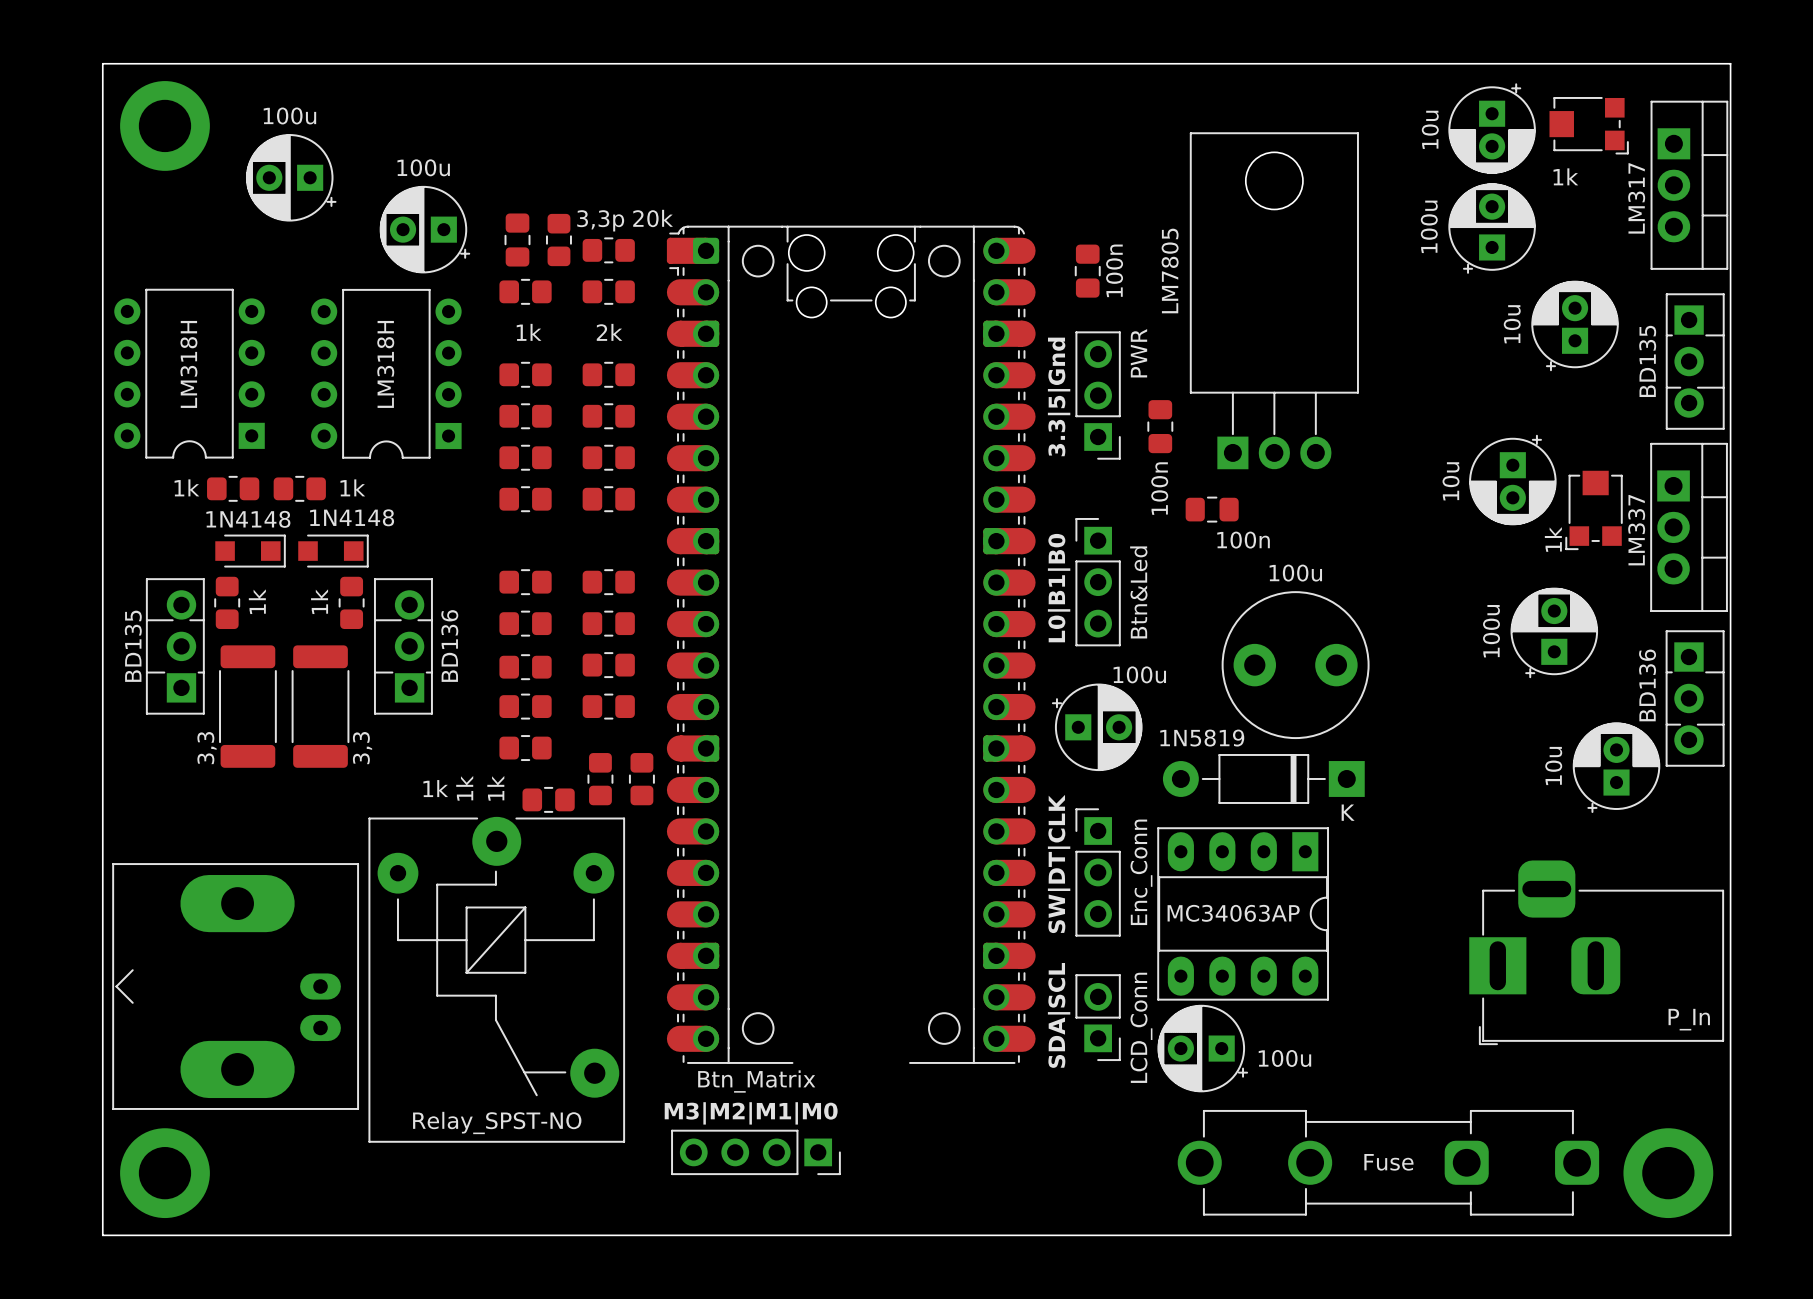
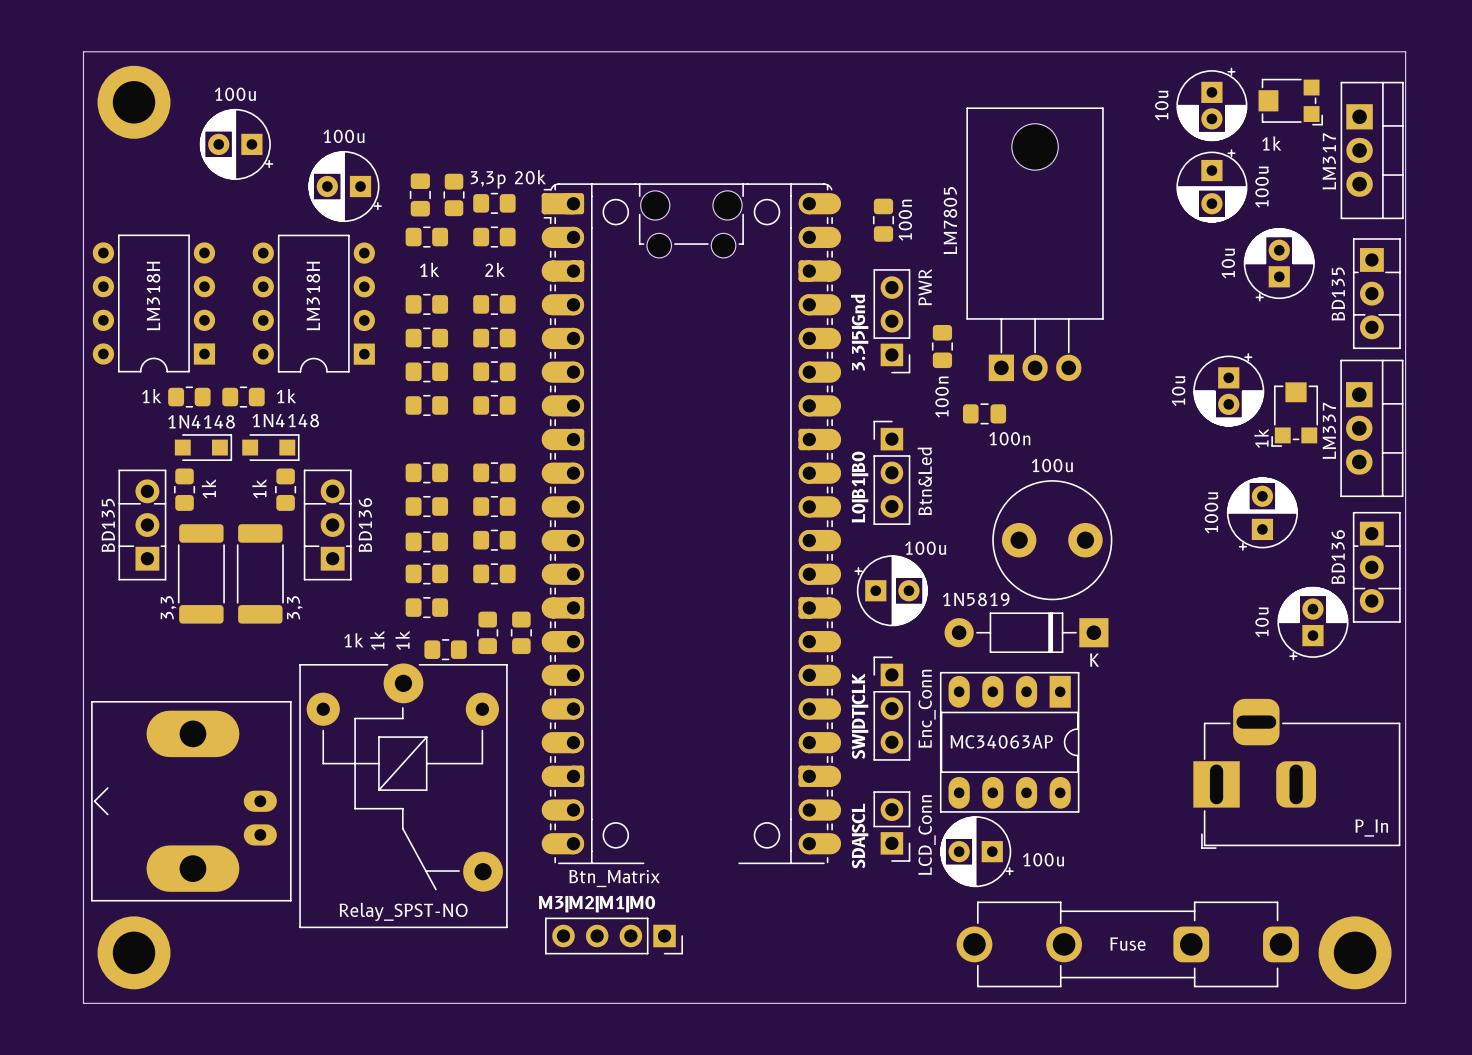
part rotation: 0° (1492, 228) -> 180° (1211, 185)

